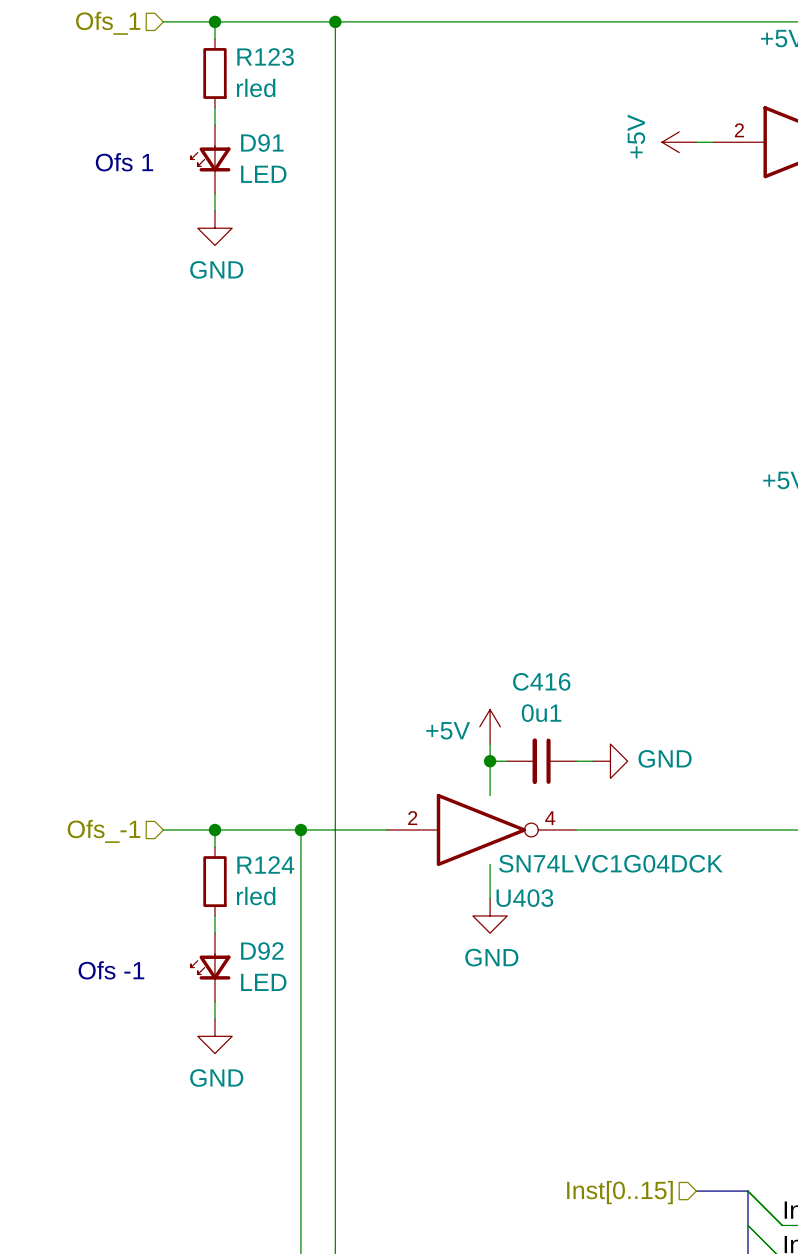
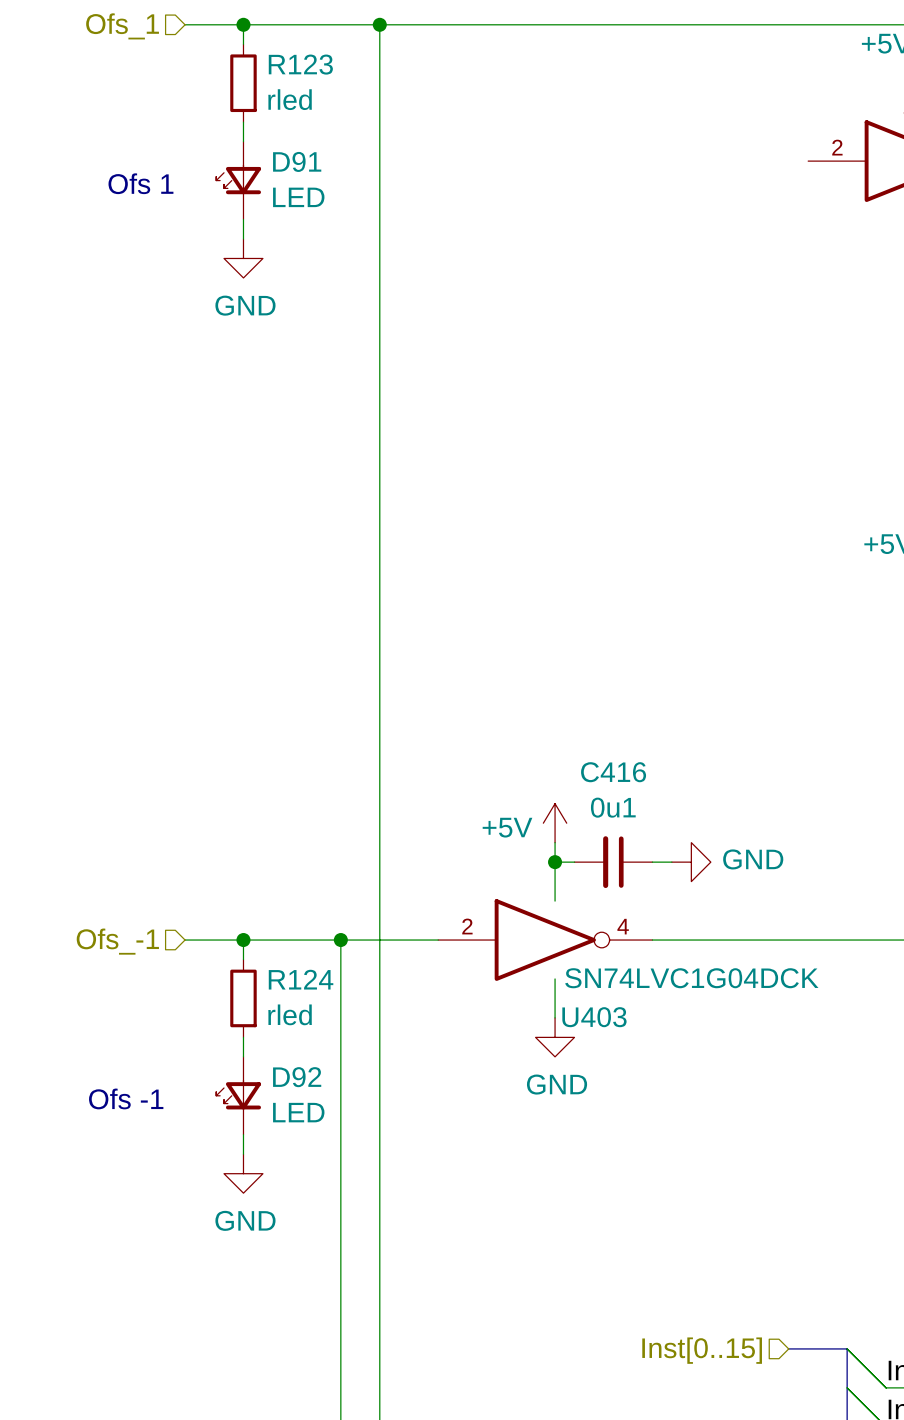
power symbol: +5V (679, 142) -> none
wire: (696, 142) (713, 142) -> none

